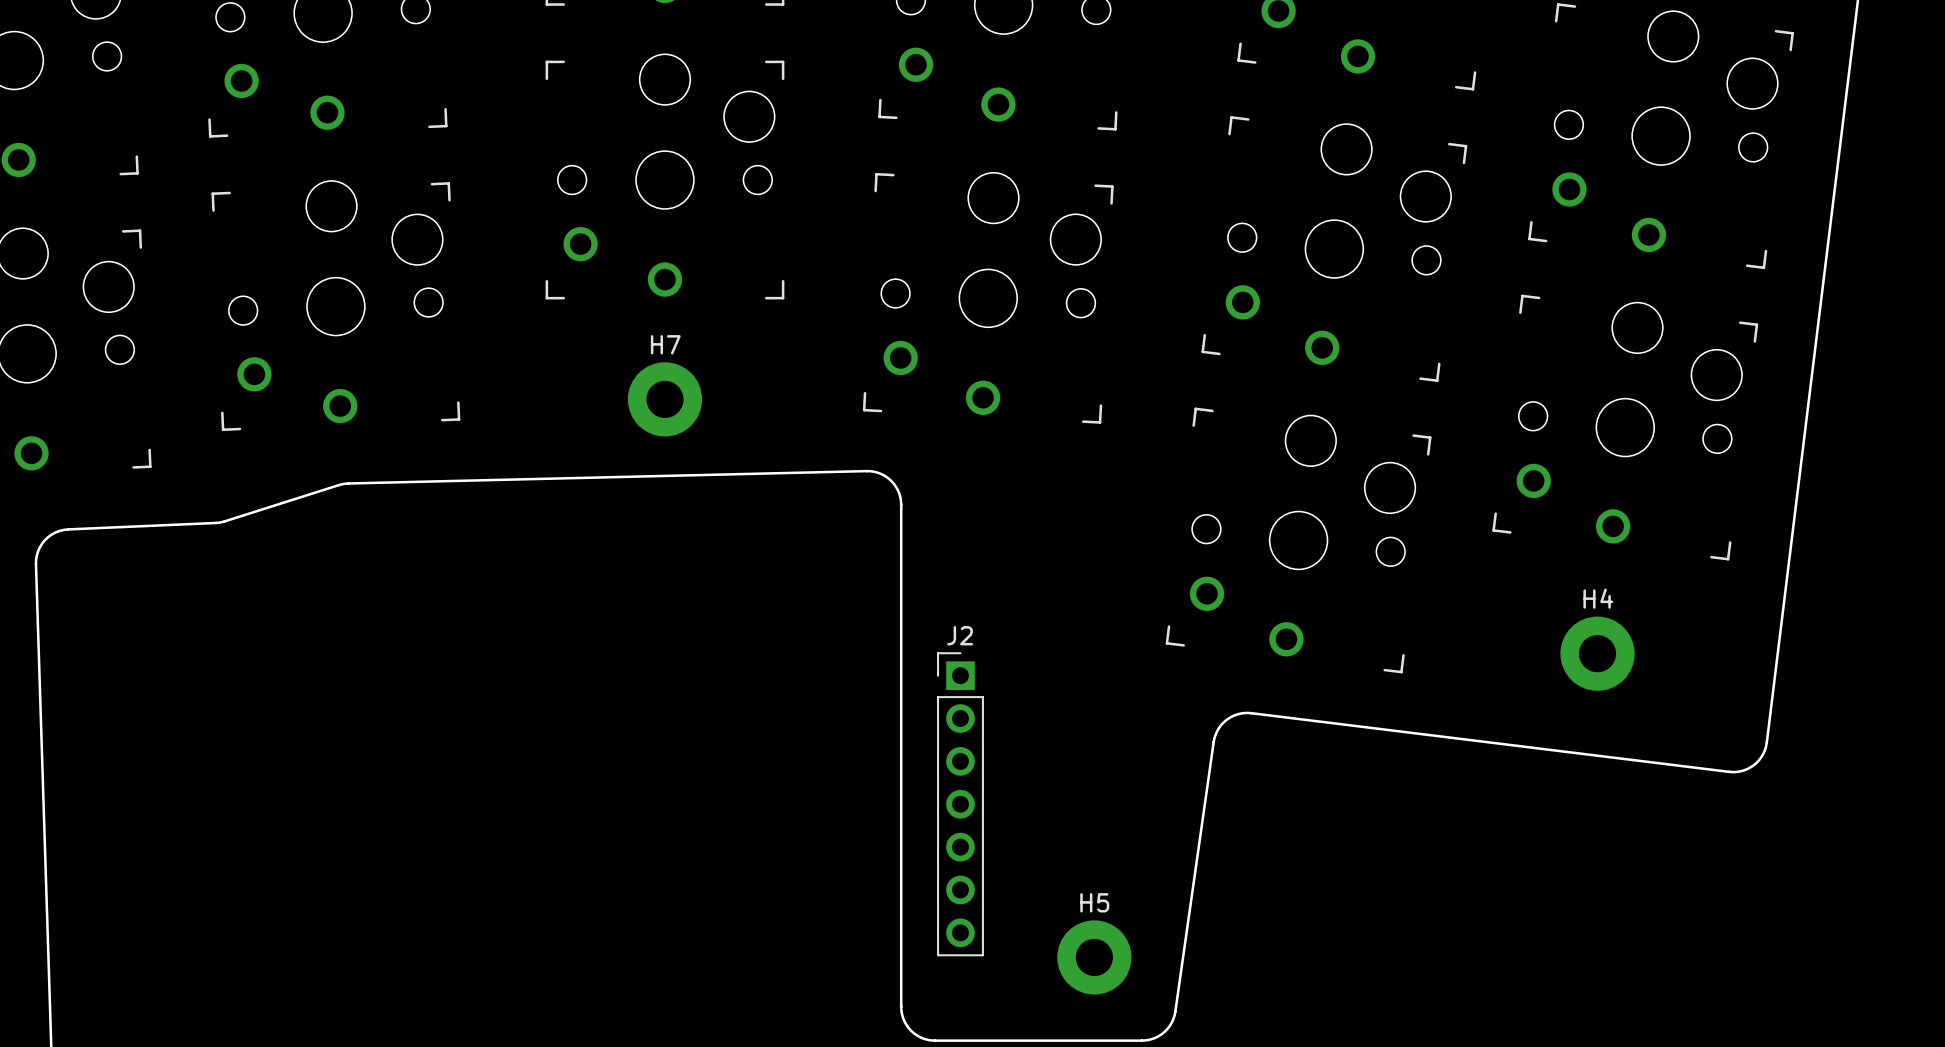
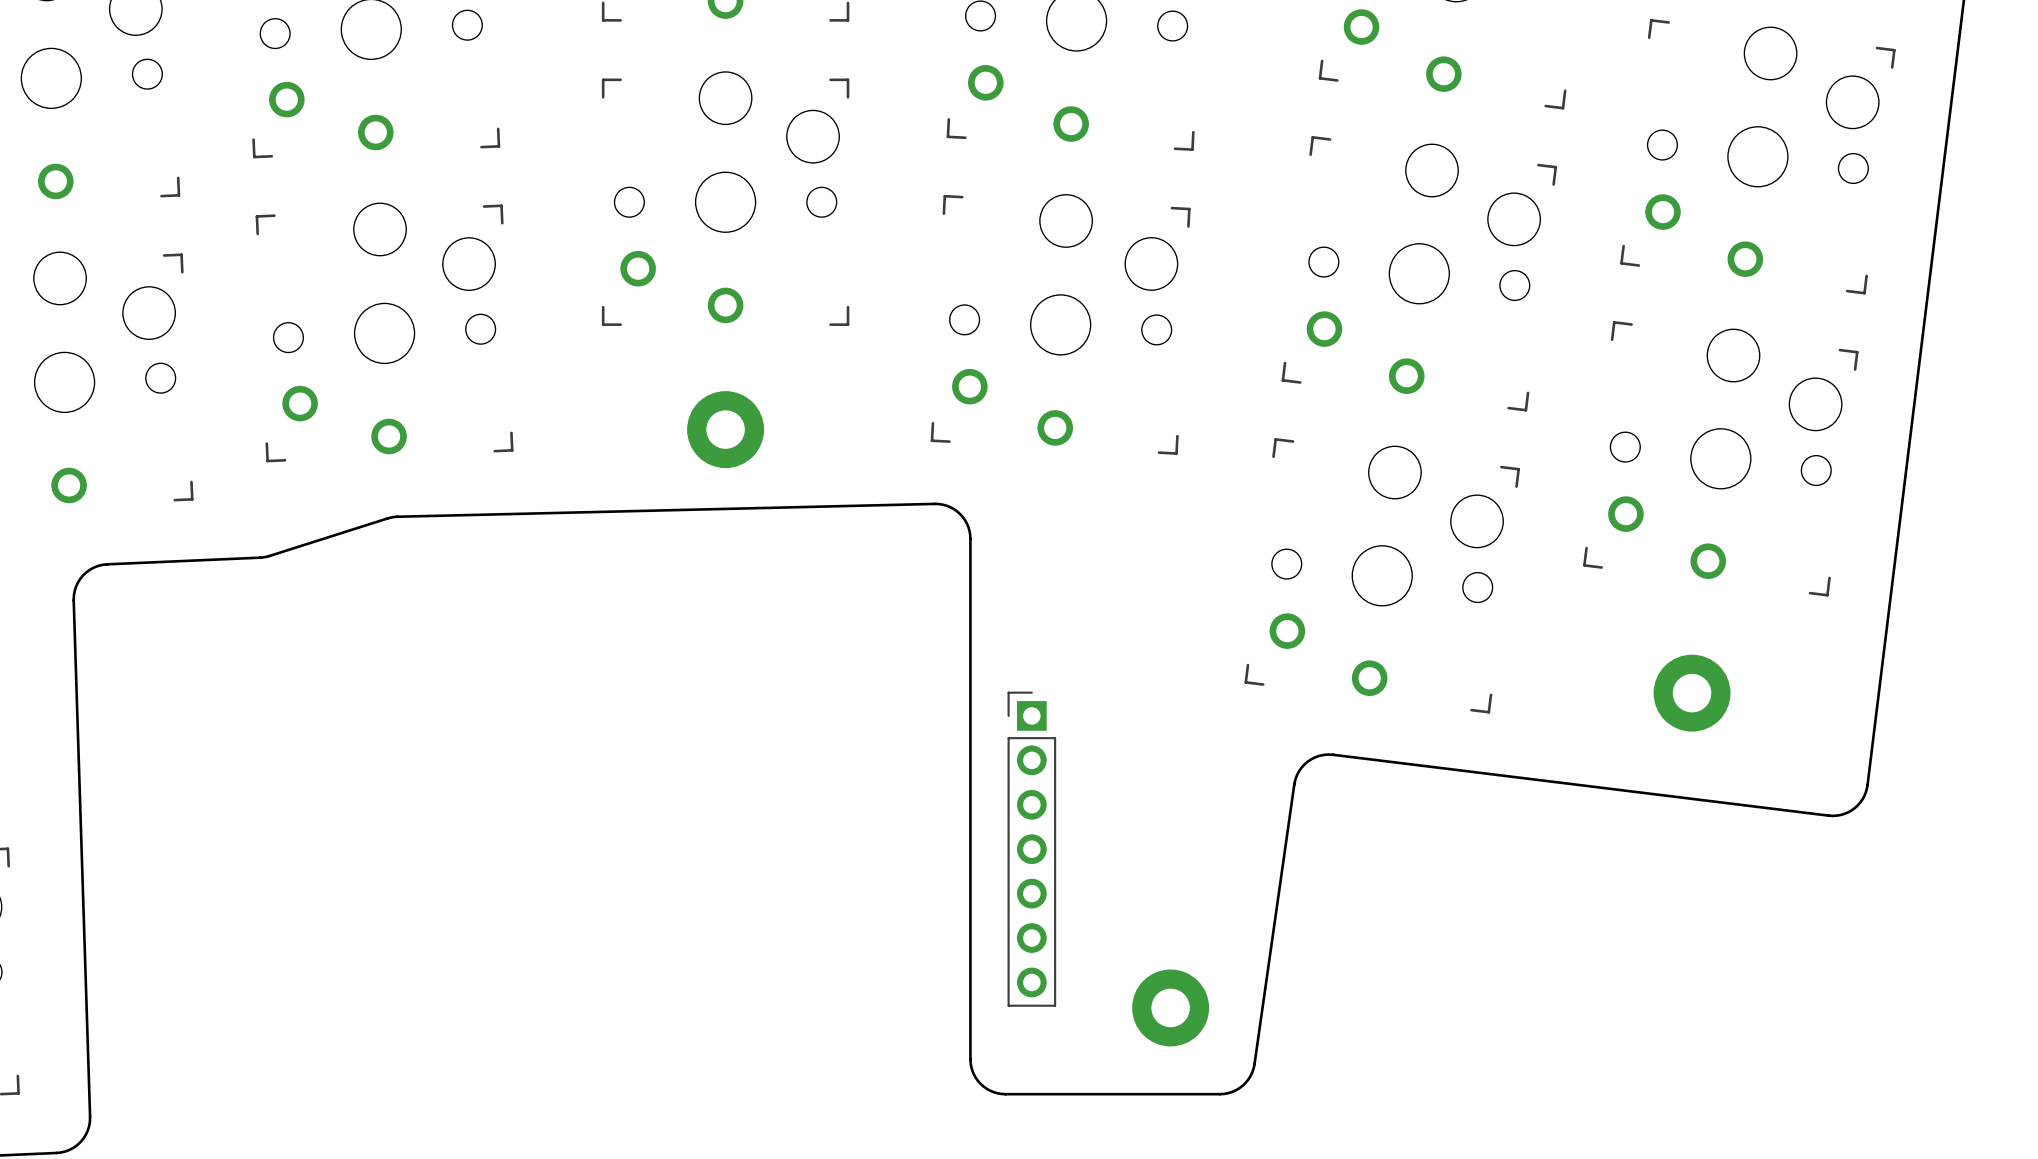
H7 name: H7 (665, 344) -> none
H4 name: H4 (1598, 598) -> none
J2 name: J2 (960, 635) -> none
H5 name: H5 (1094, 902) -> none

